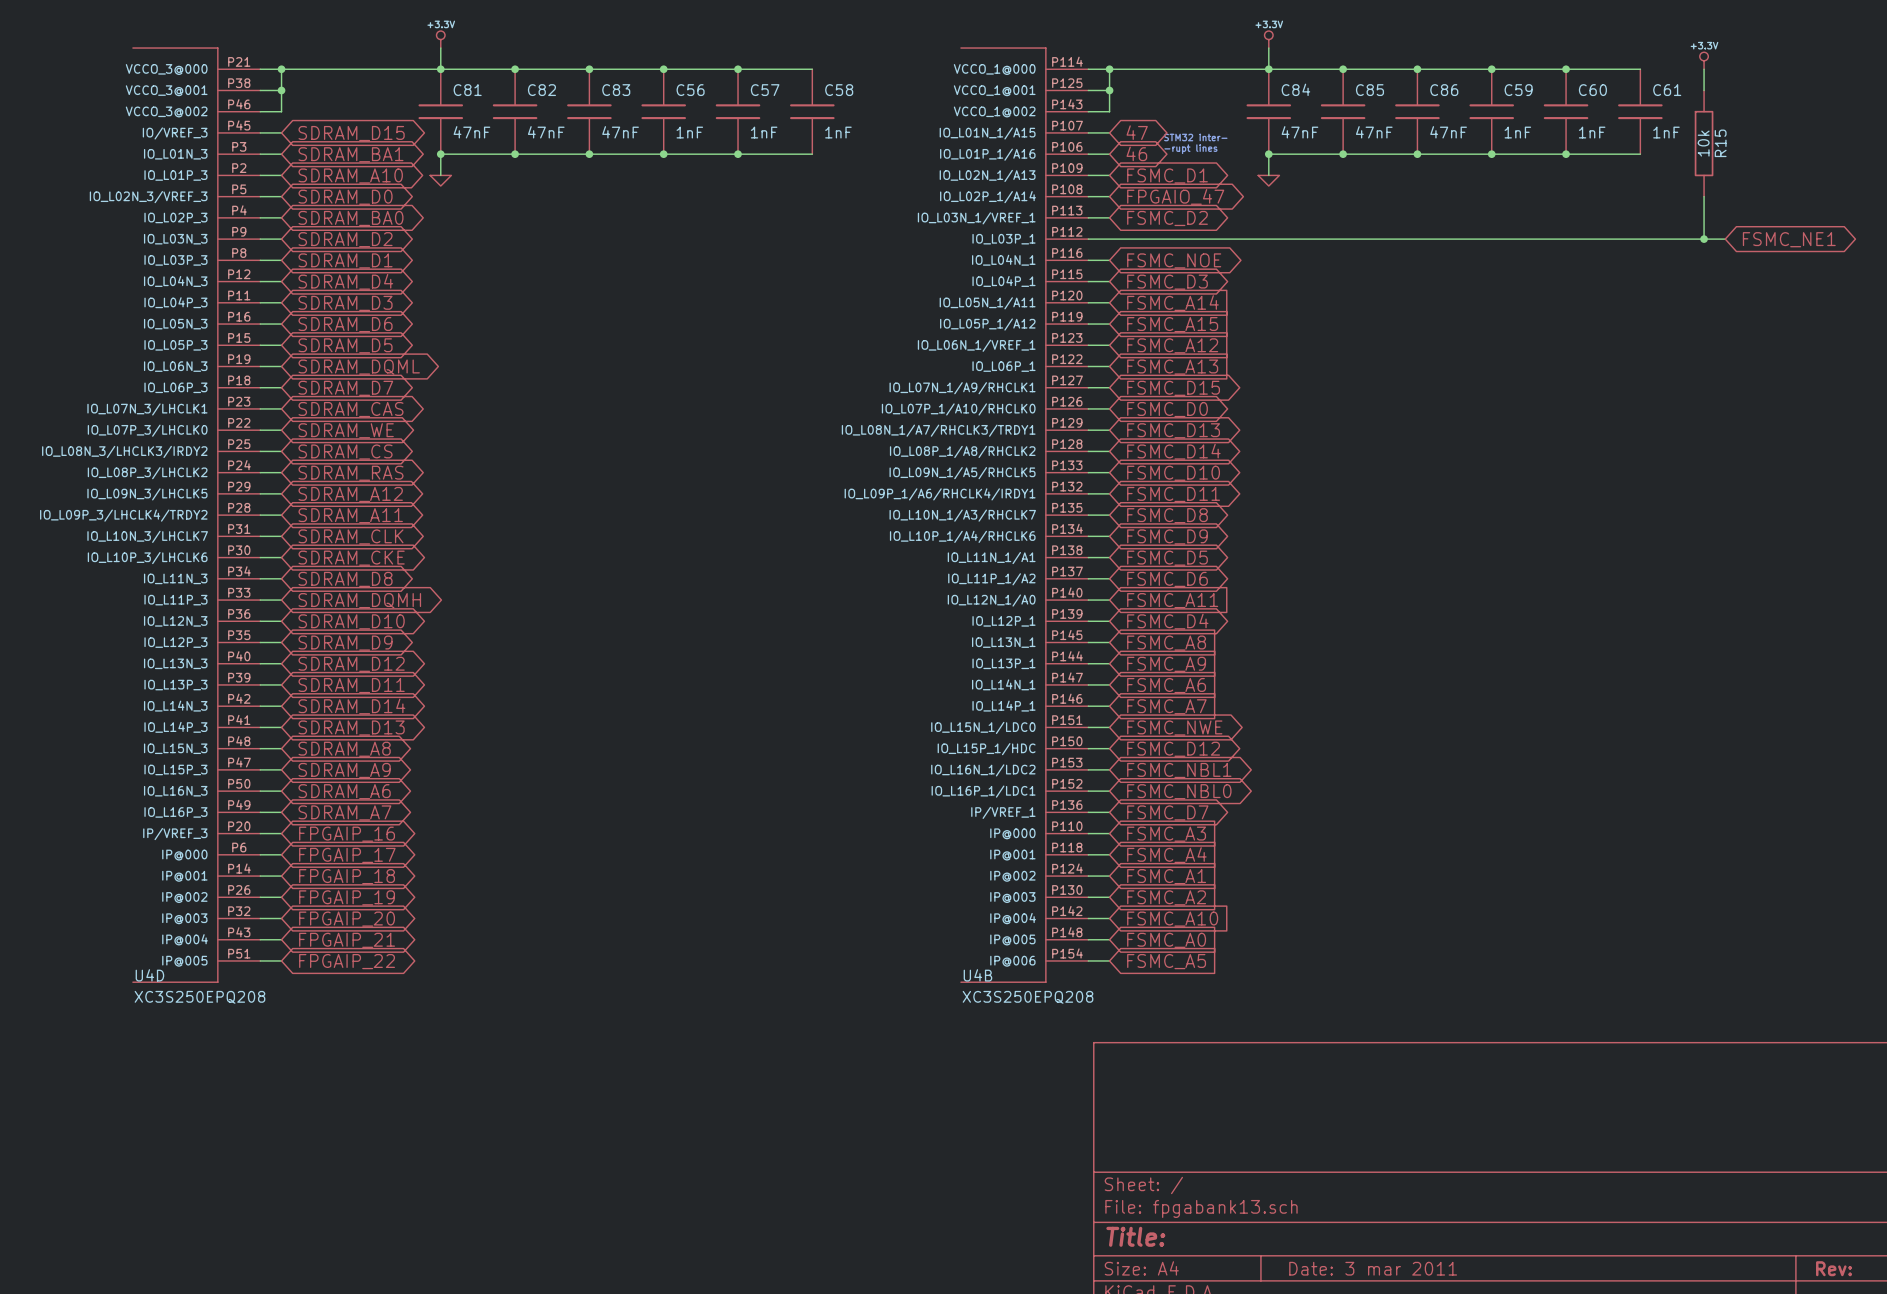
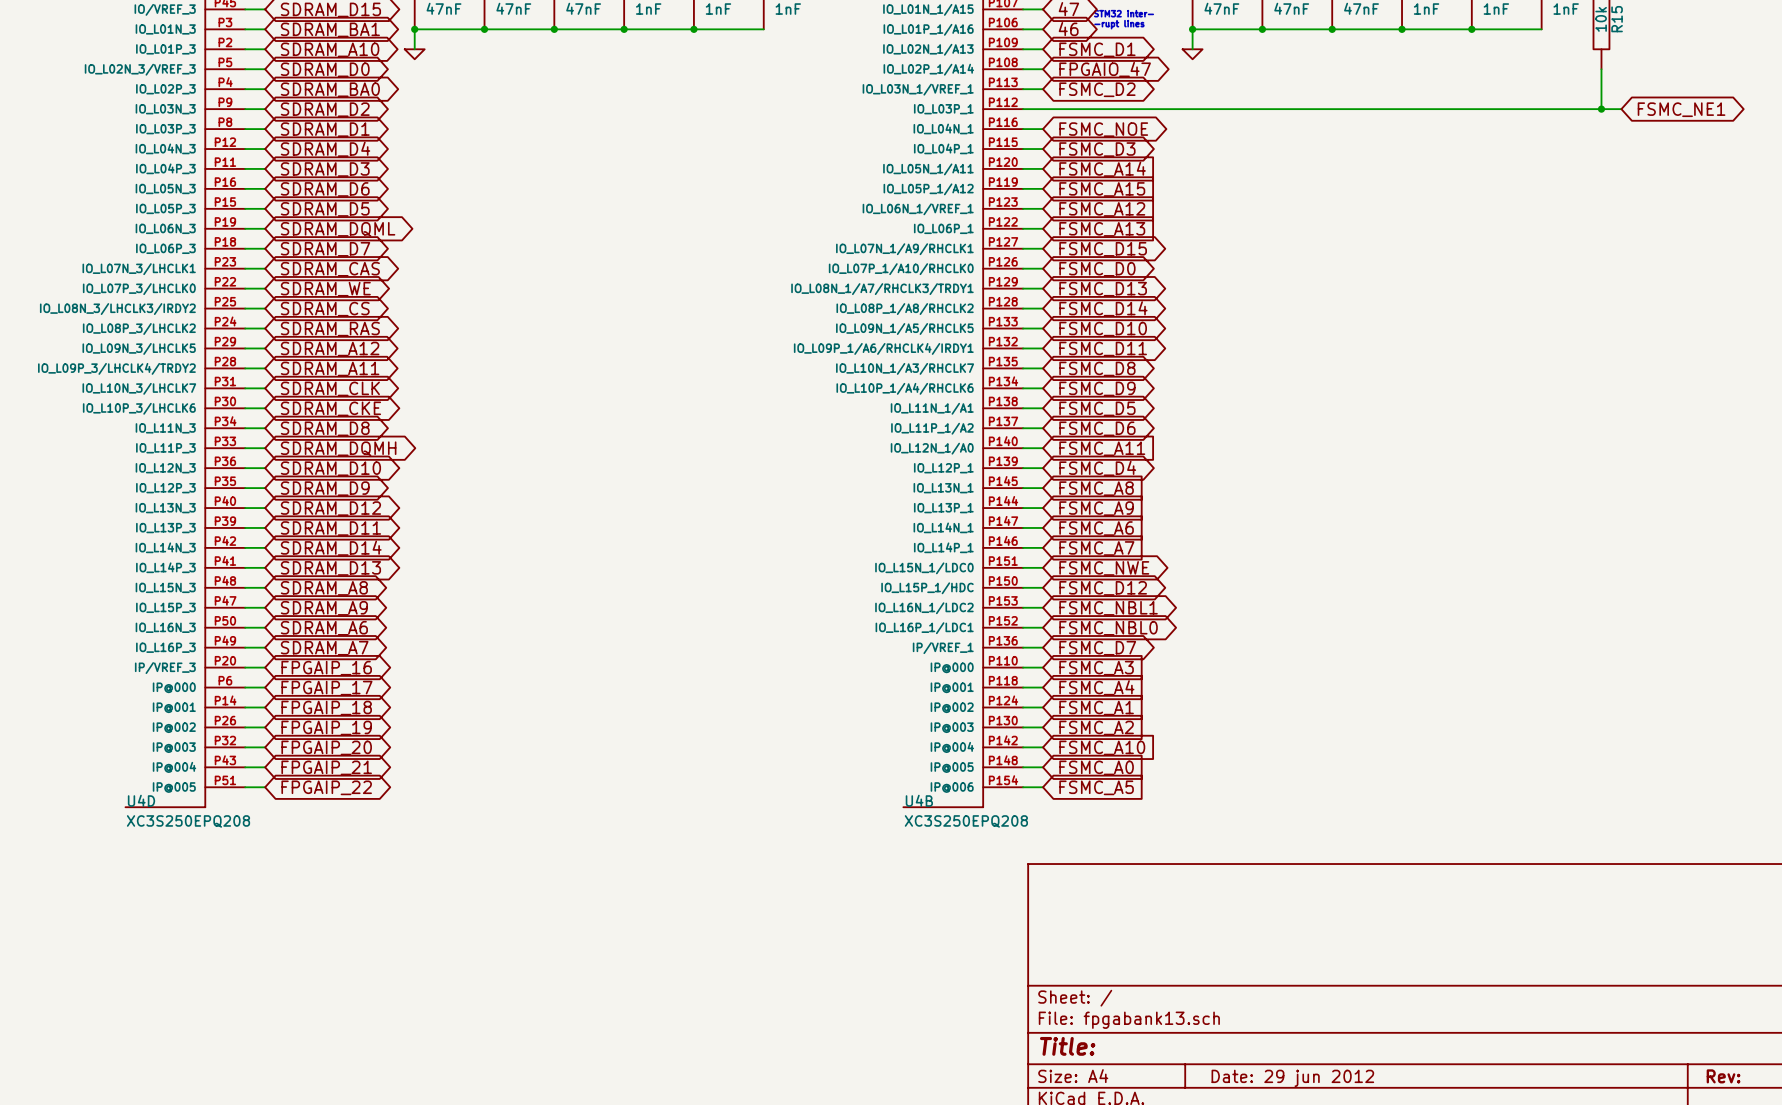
title block: Date: 3 mar 2011 (1373, 1268) -> Date: 29 jun 2012 (1292, 1078)

